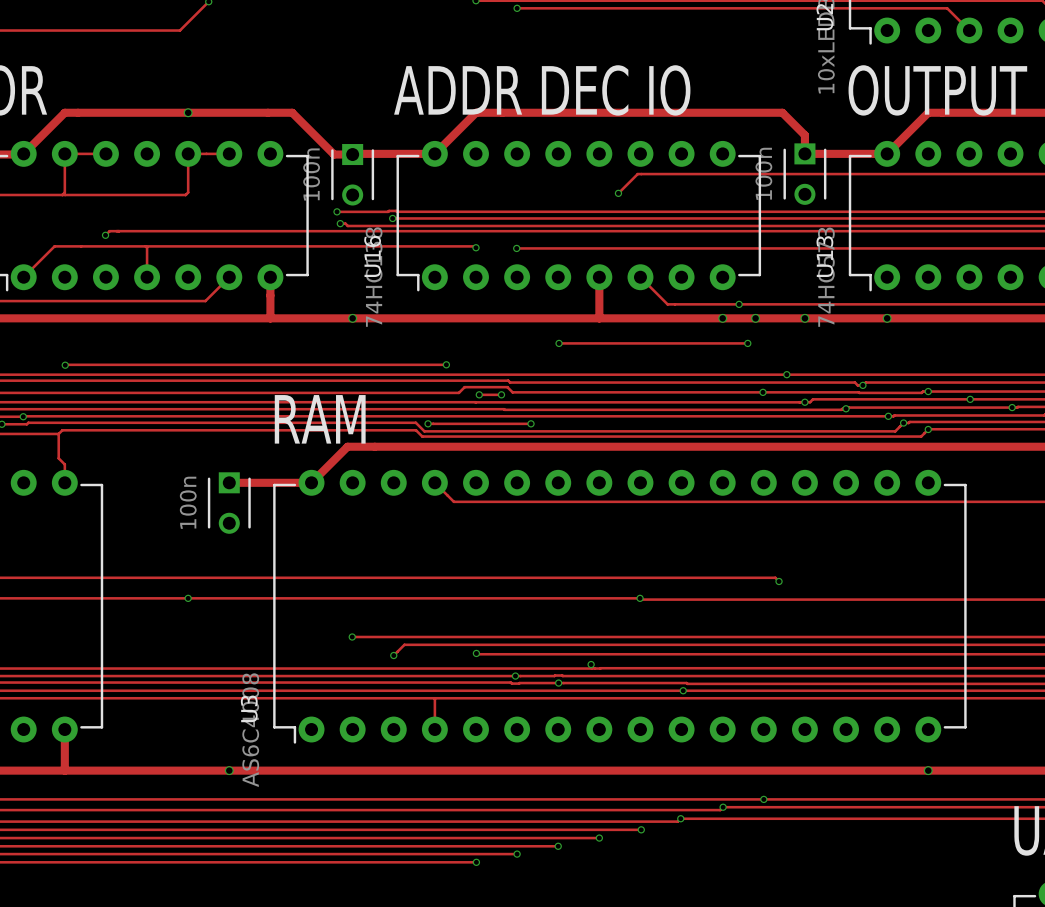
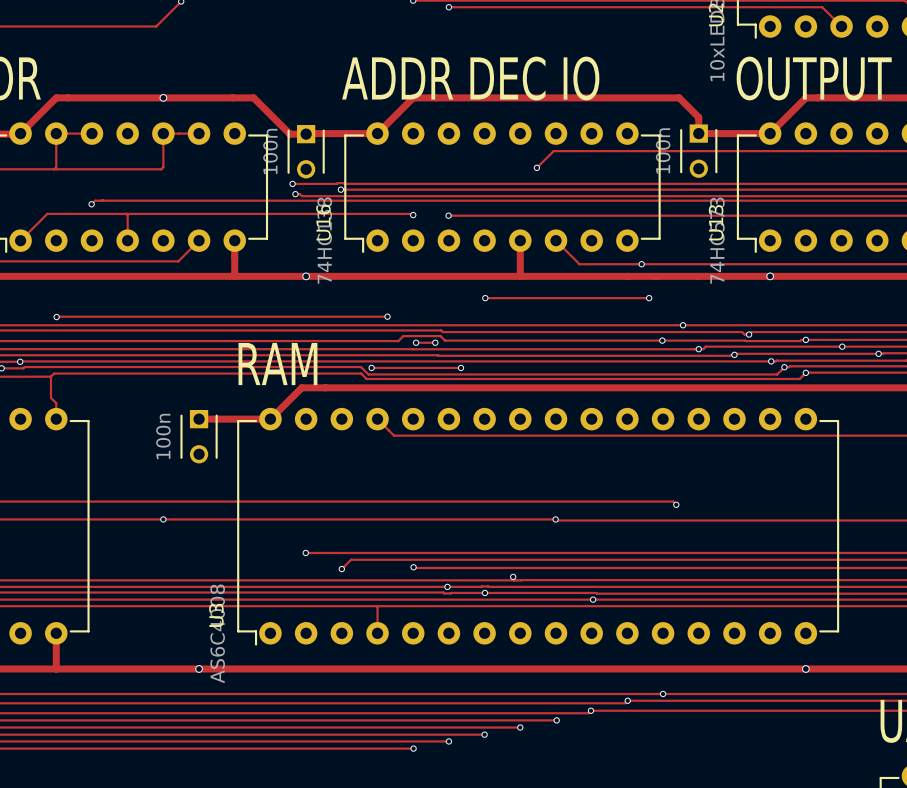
via: (722, 318) -> none
via: (755, 318) -> none
via: (804, 318) -> none

